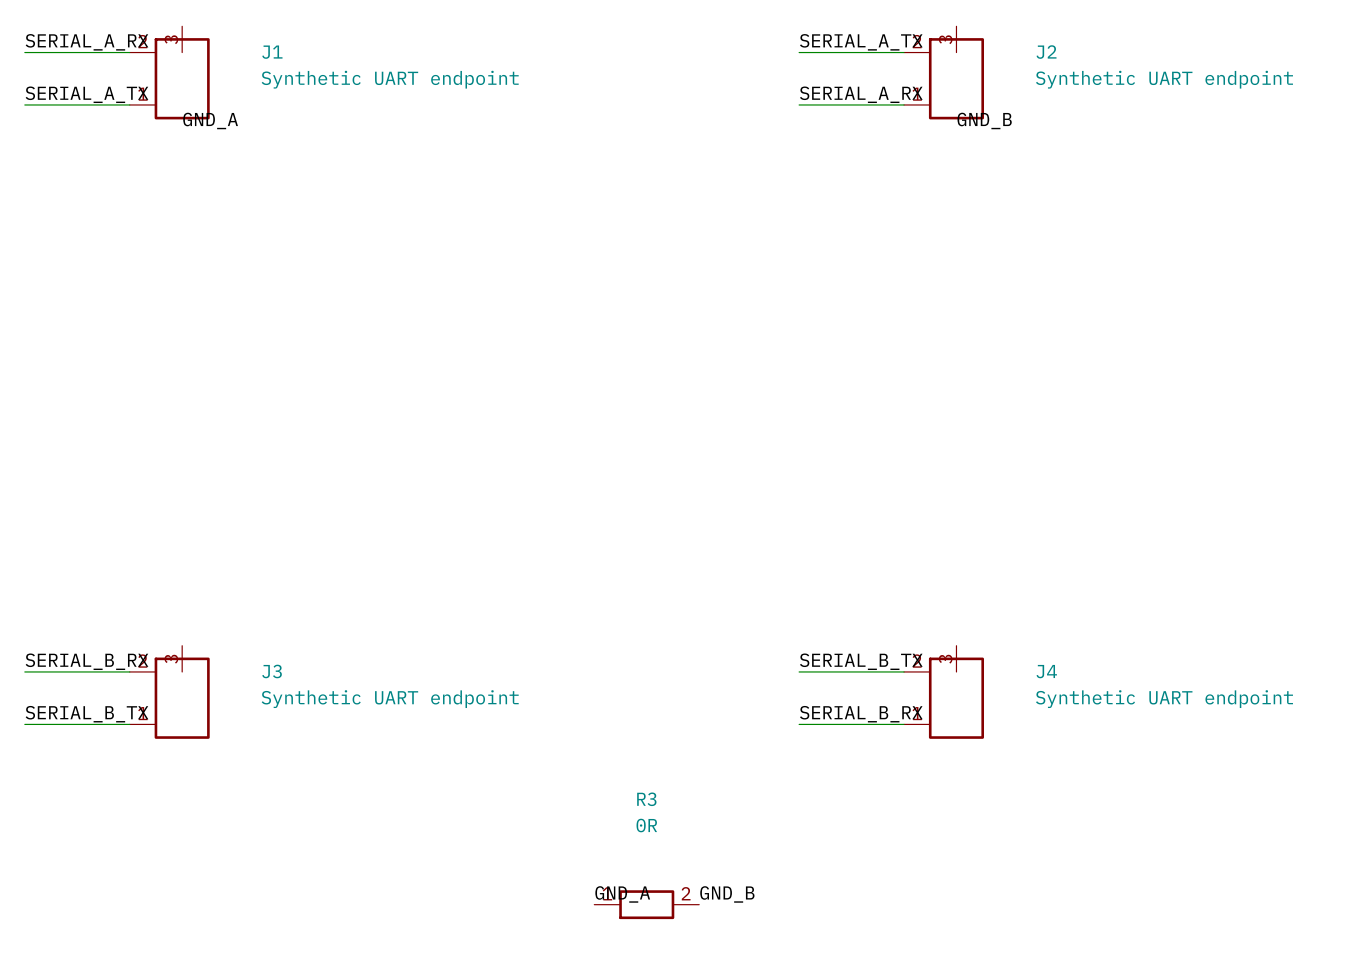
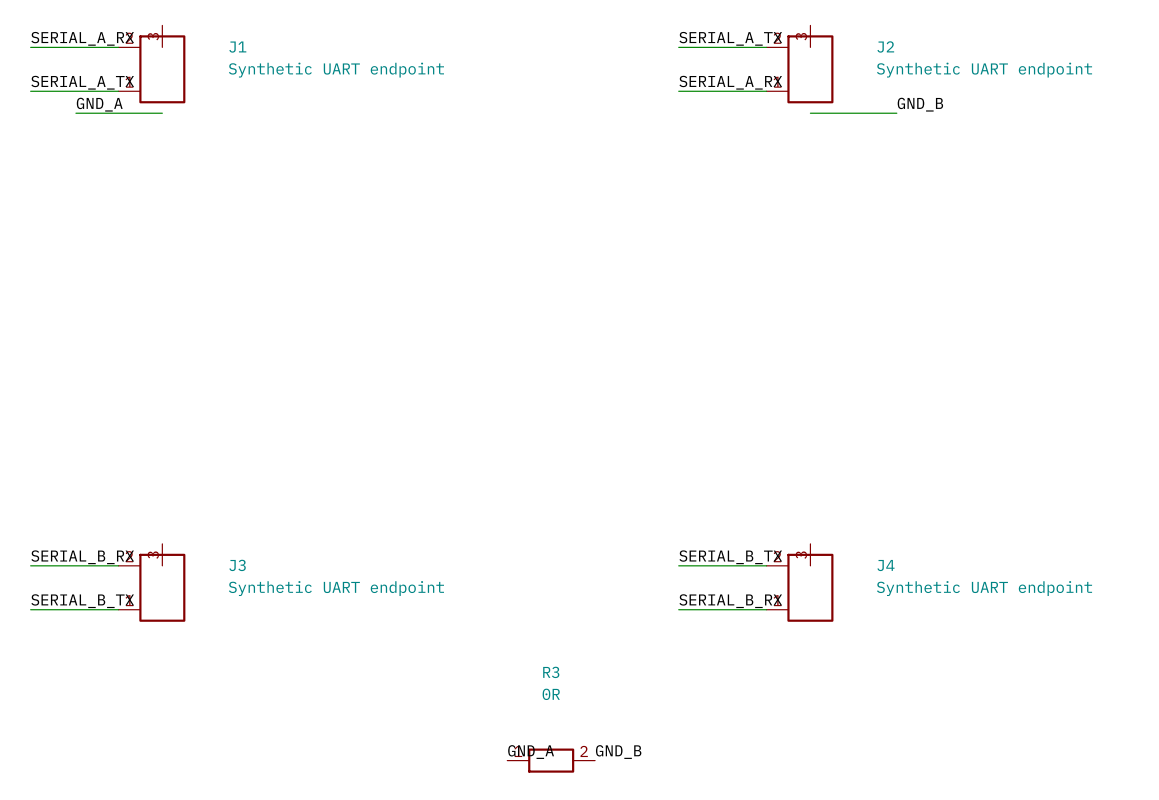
label position: GND_A (210, 120) -> GND_A (99, 104)
label position: GND_B (984, 120) -> GND_B (920, 104)
wire: none -> (75, 113) (162, 113)
wire: none -> (810, 113) (896, 113)

